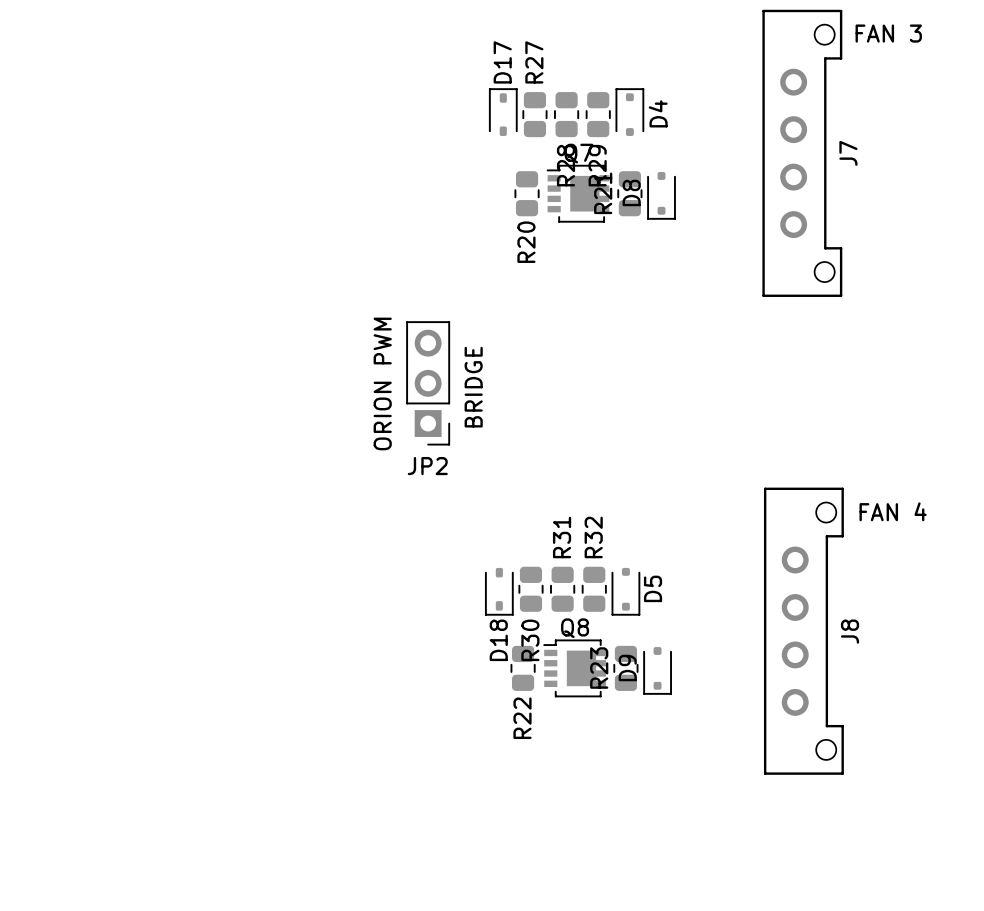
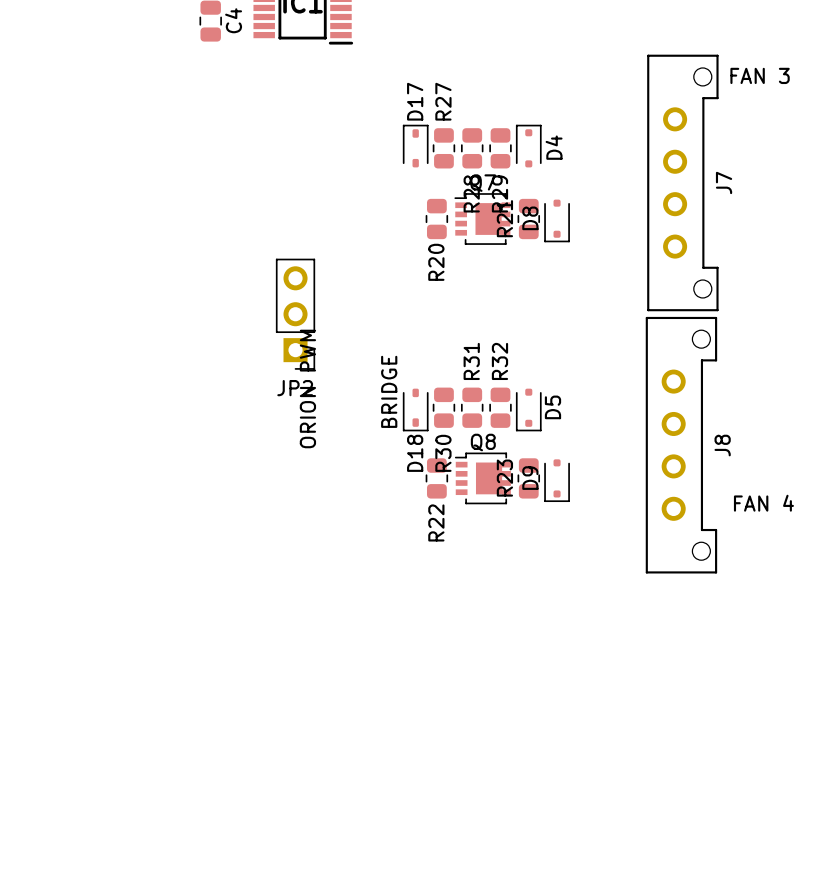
JP2 position: (428, 383) -> (295, 314)
R30 position: (530, 589) -> (443, 407)
R31 position: (562, 589) -> (472, 407)
R32 position: (594, 589) -> (500, 407)
D18 position: (499, 591) -> (415, 410)
D5 position: (625, 591) -> (528, 410)
J8 position: (803, 631) -> (681, 445)
R22 position: (523, 668) -> (436, 478)
Q8 position: (574, 668) -> (482, 478)
R23 position: (625, 668) -> (528, 478)
D9 position: (657, 670) -> (557, 480)

